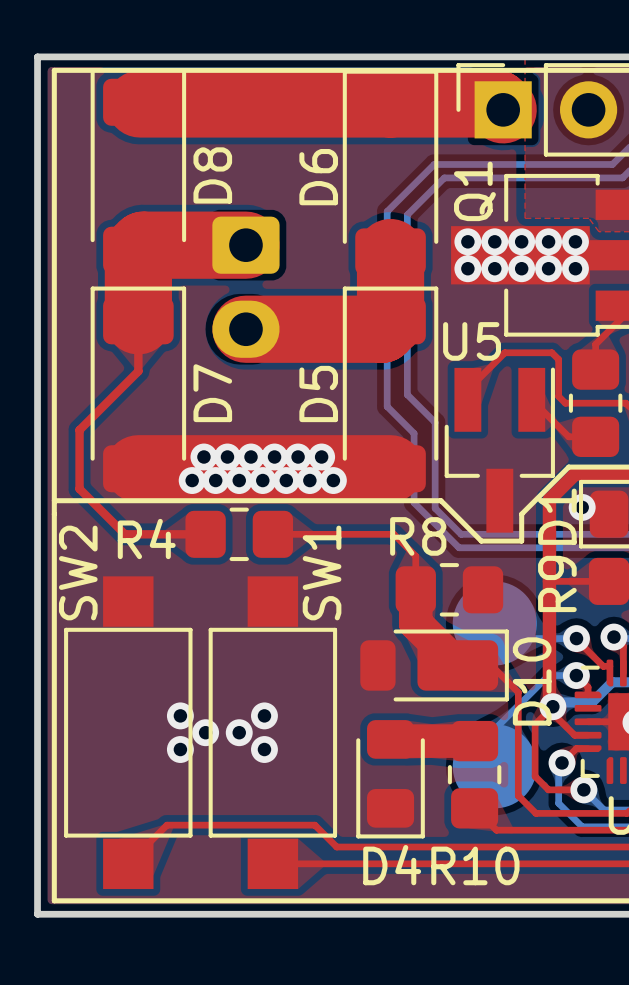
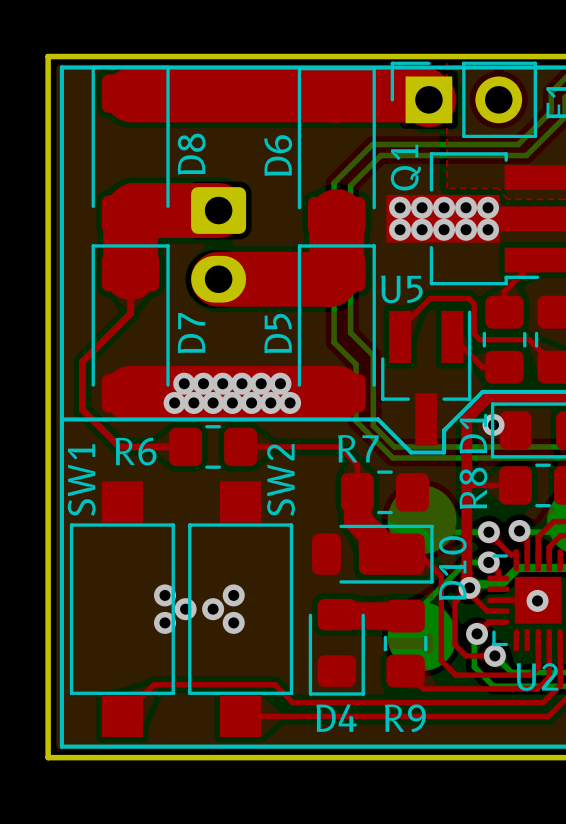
R8 name: R8 (418, 536) -> R7 (358, 448)
R4 name: R4 (146, 538) -> R6 (135, 451)
SW2 name: SW2 (78, 572) -> SW1 (81, 480)
SW1 name: SW1 (322, 572) -> SW2 (280, 480)
R9 name: R9 (557, 583) -> R8 (473, 488)
R10 name: R10 (475, 865) -> R9 (405, 718)

